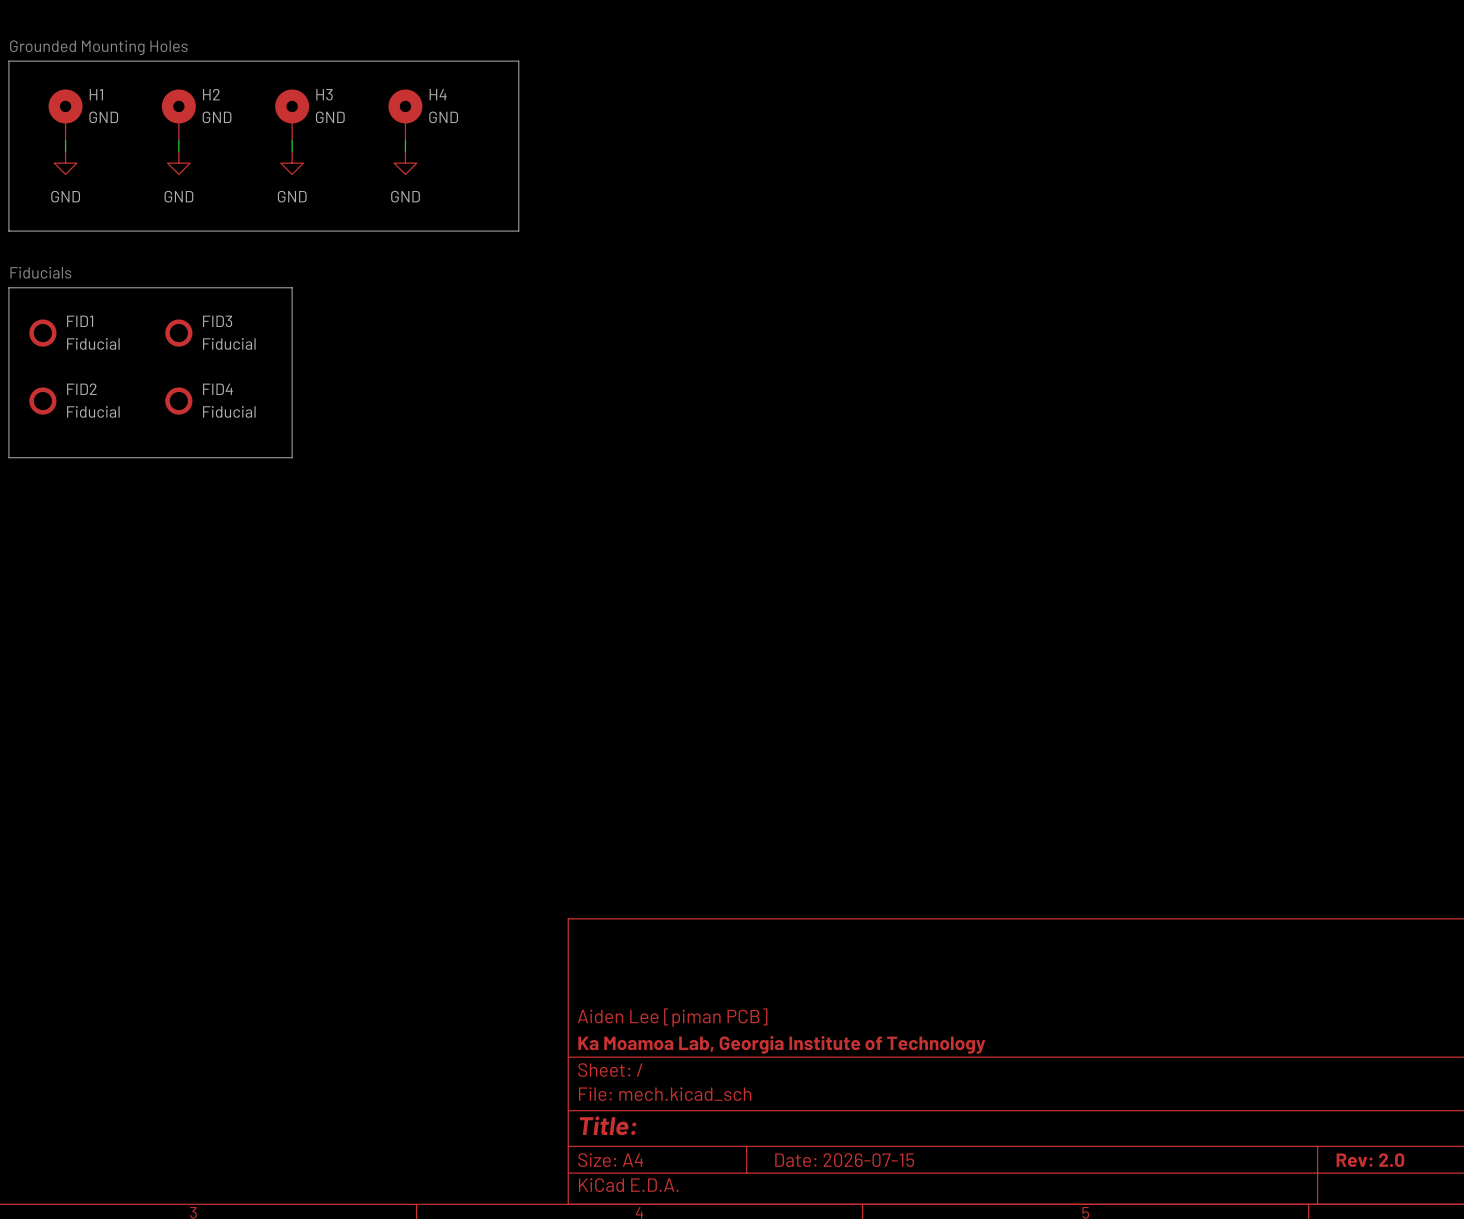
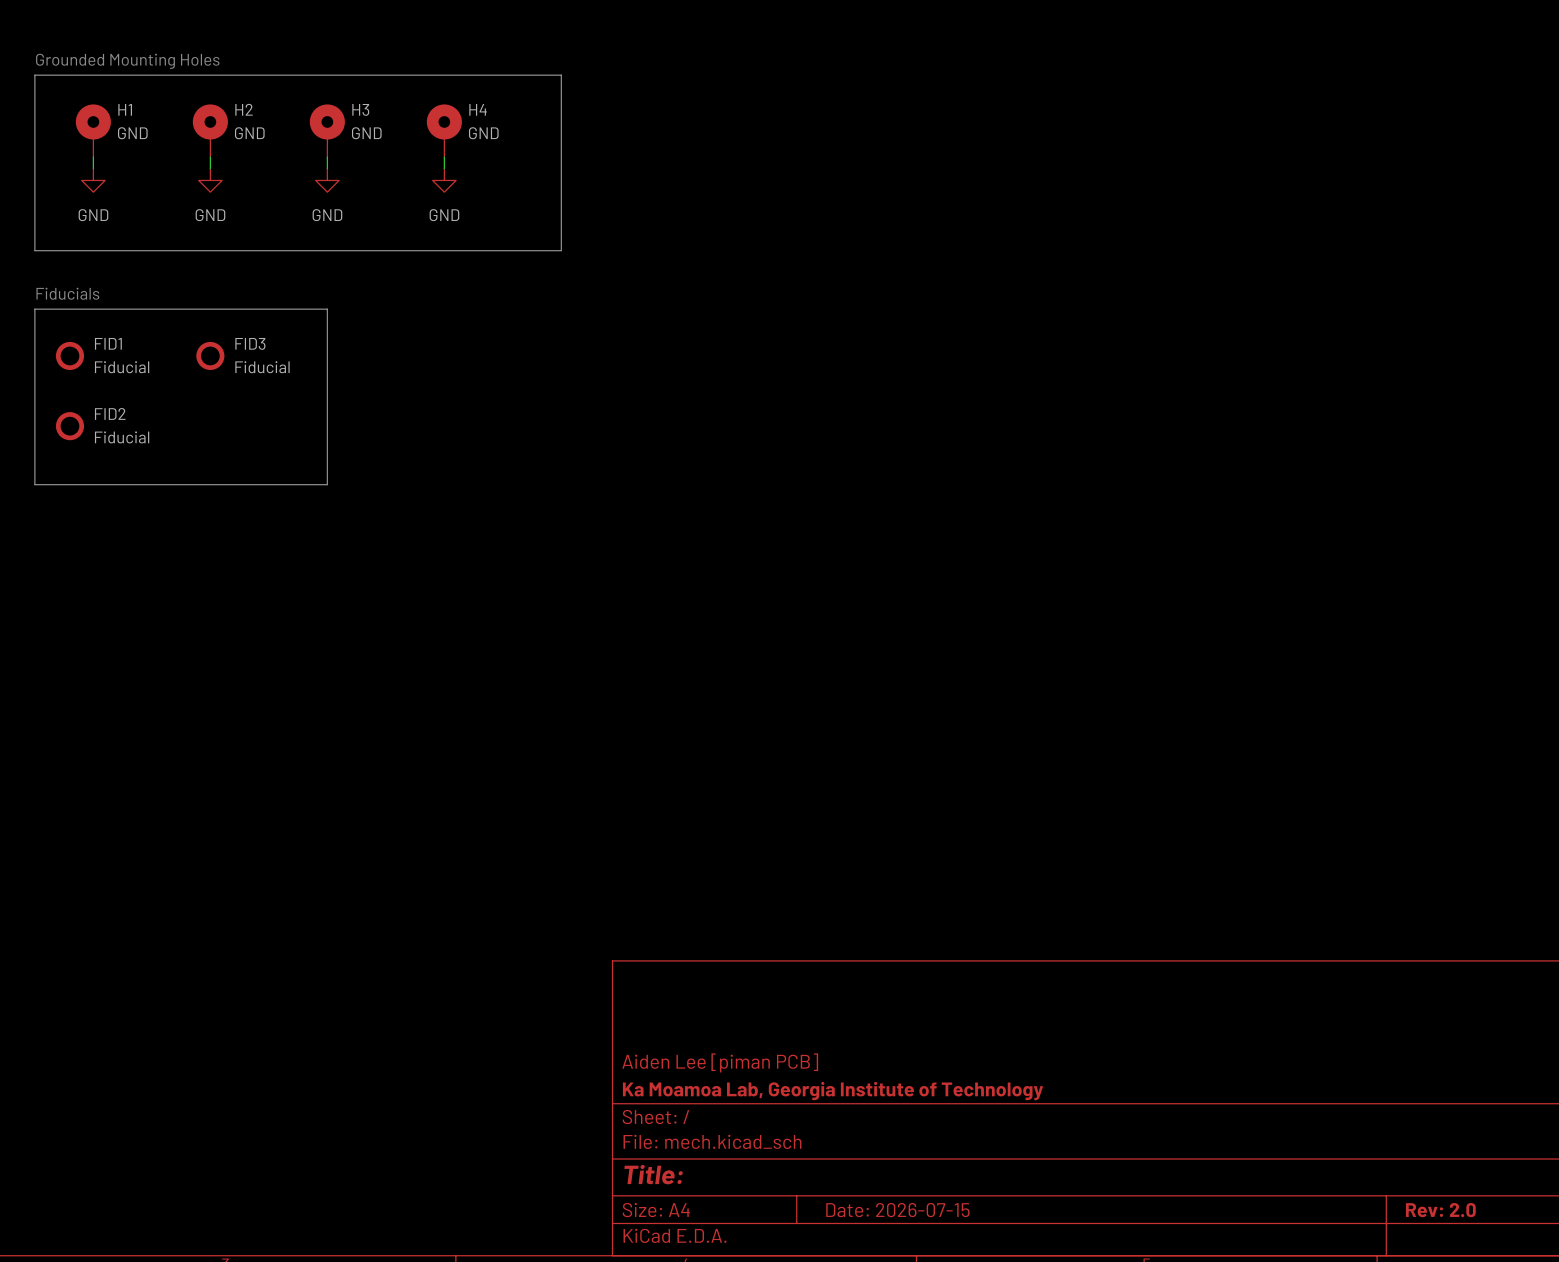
FID4: Fiducial (178, 401) -> none

